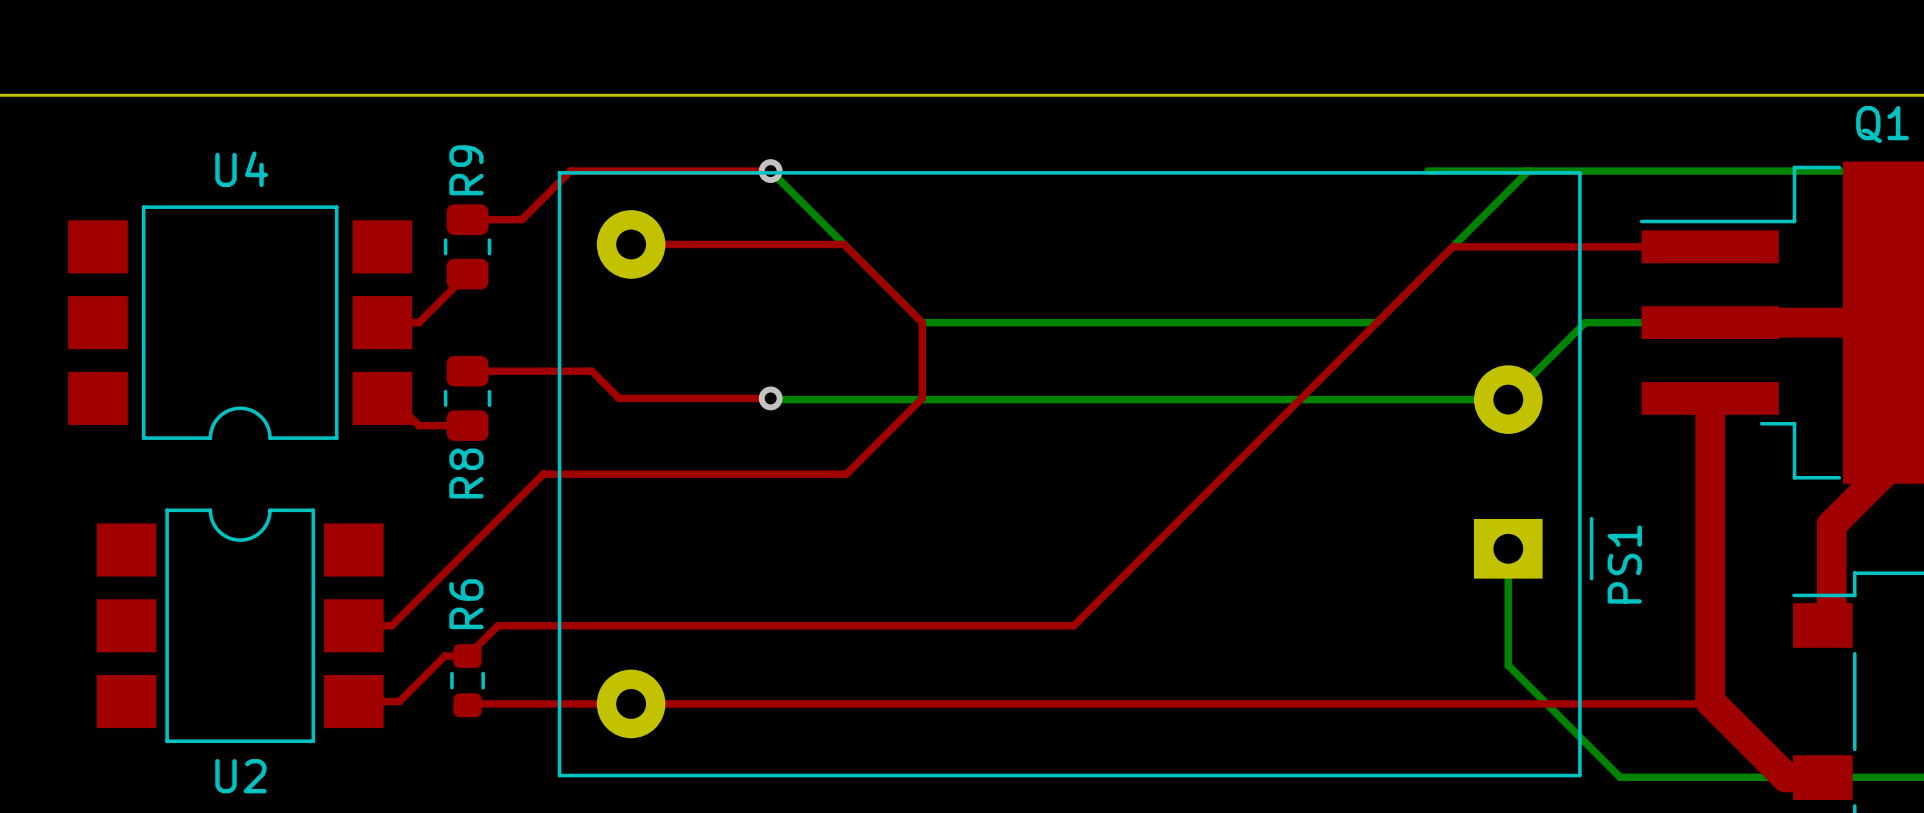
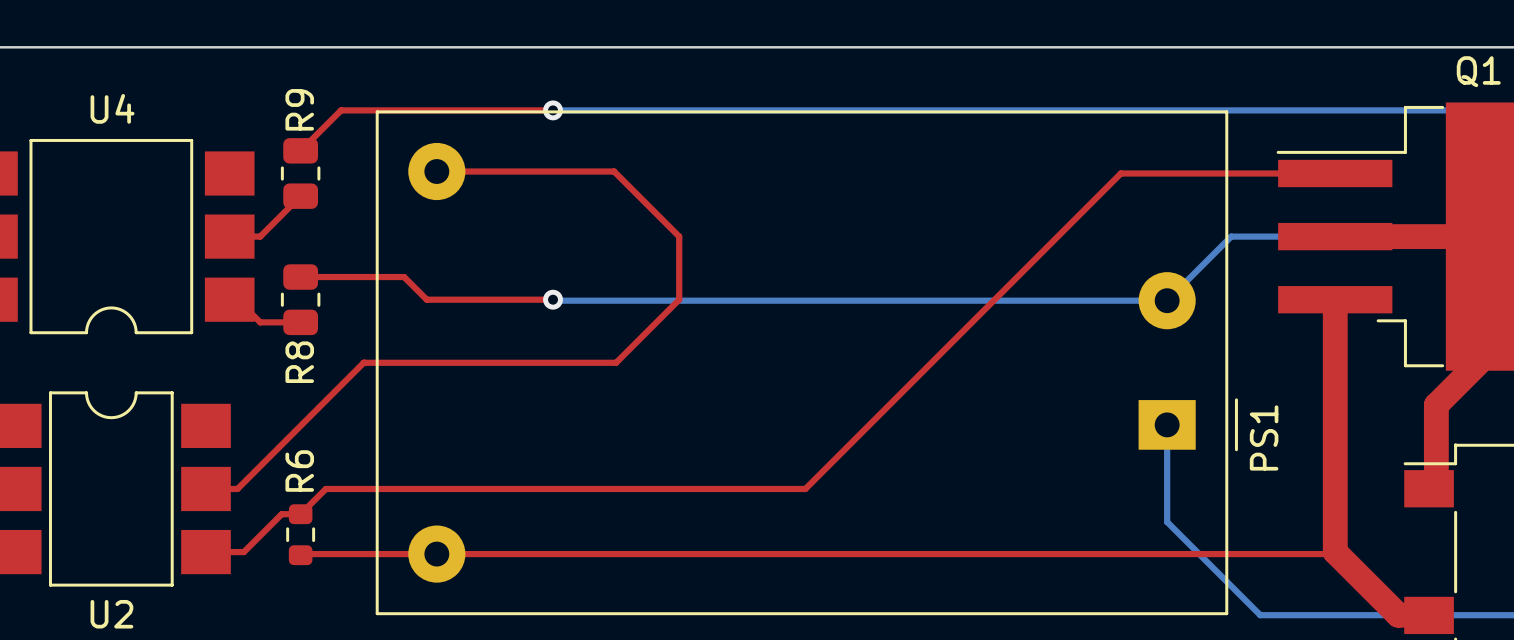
top track: (570, 171) (522, 219) (467, 219) -> (386, 110) (341, 110) (300, 150)
bottom track: (770, 171) (922, 322) (1376, 322) (1528, 171) -> (553, 110) (1100, 110)

